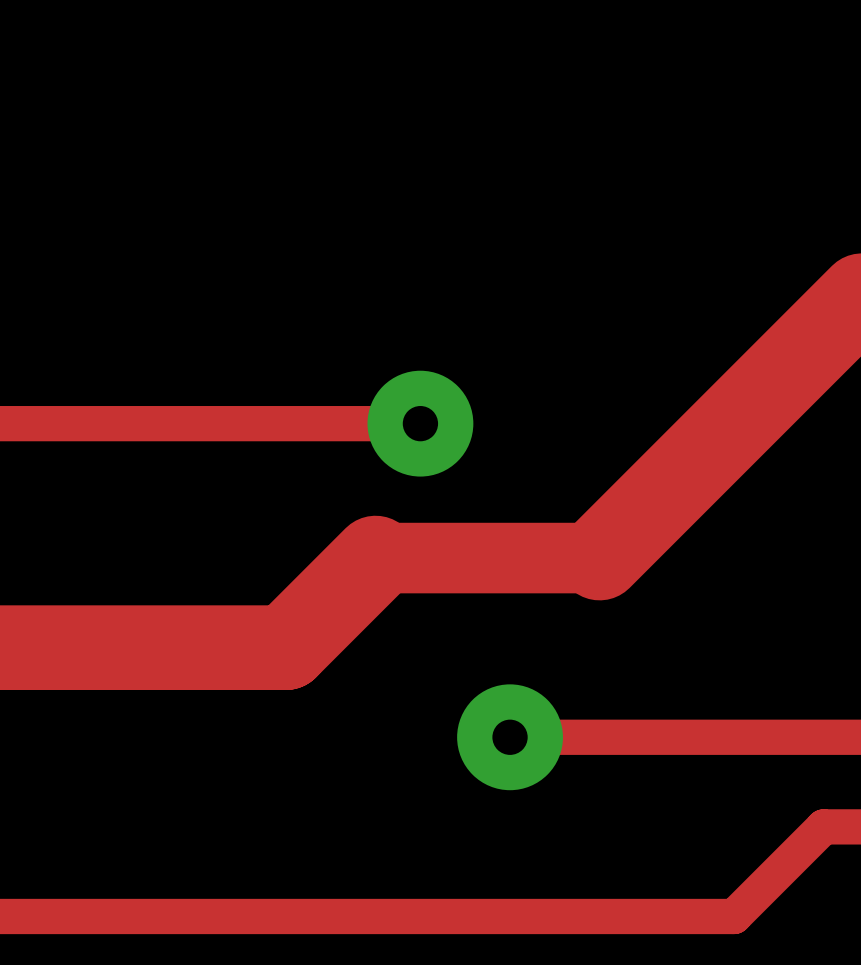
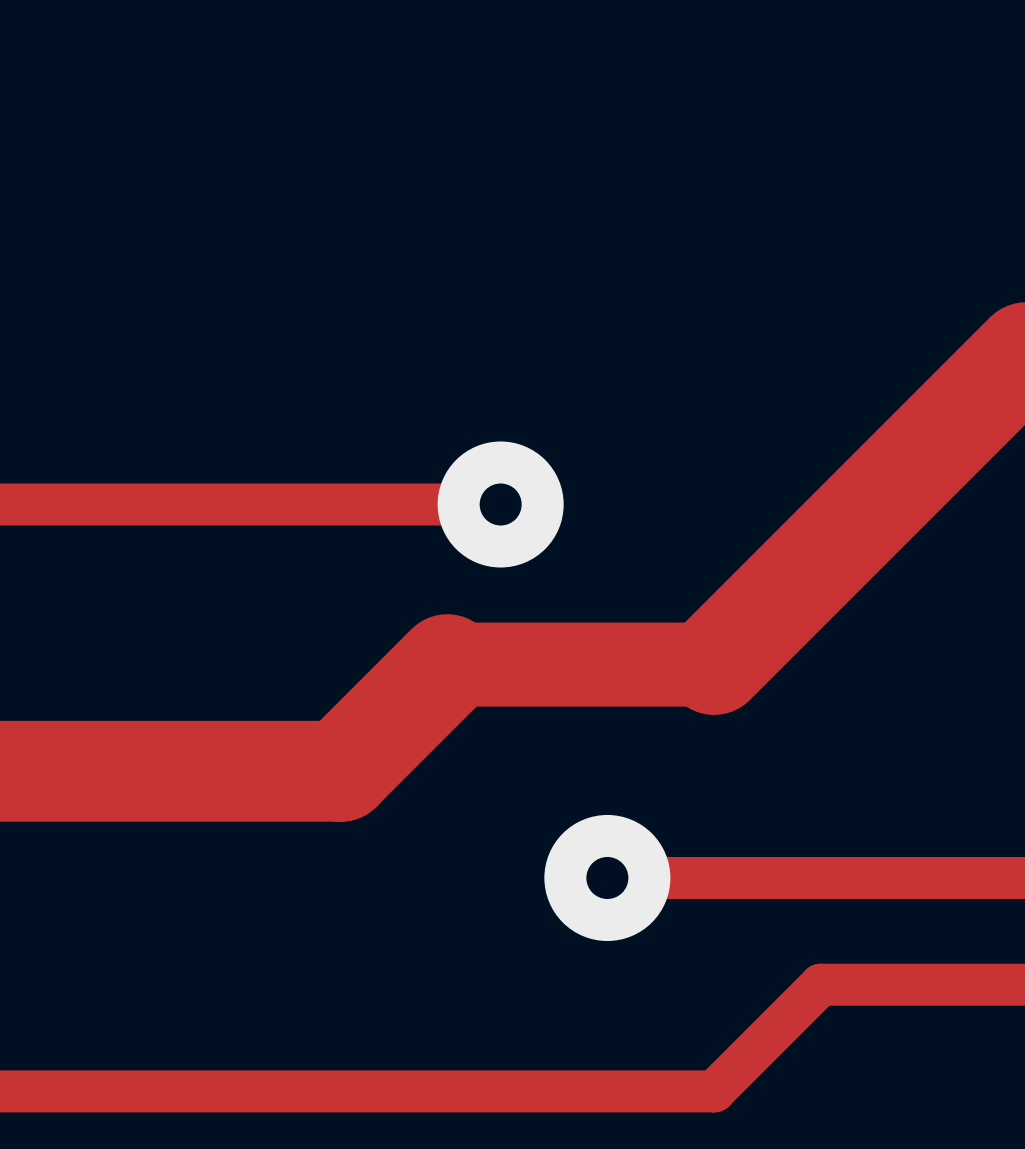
track: (823, 826) (734, 916) (599, 916) -> (980, 984) (820, 984) (714, 1091)

